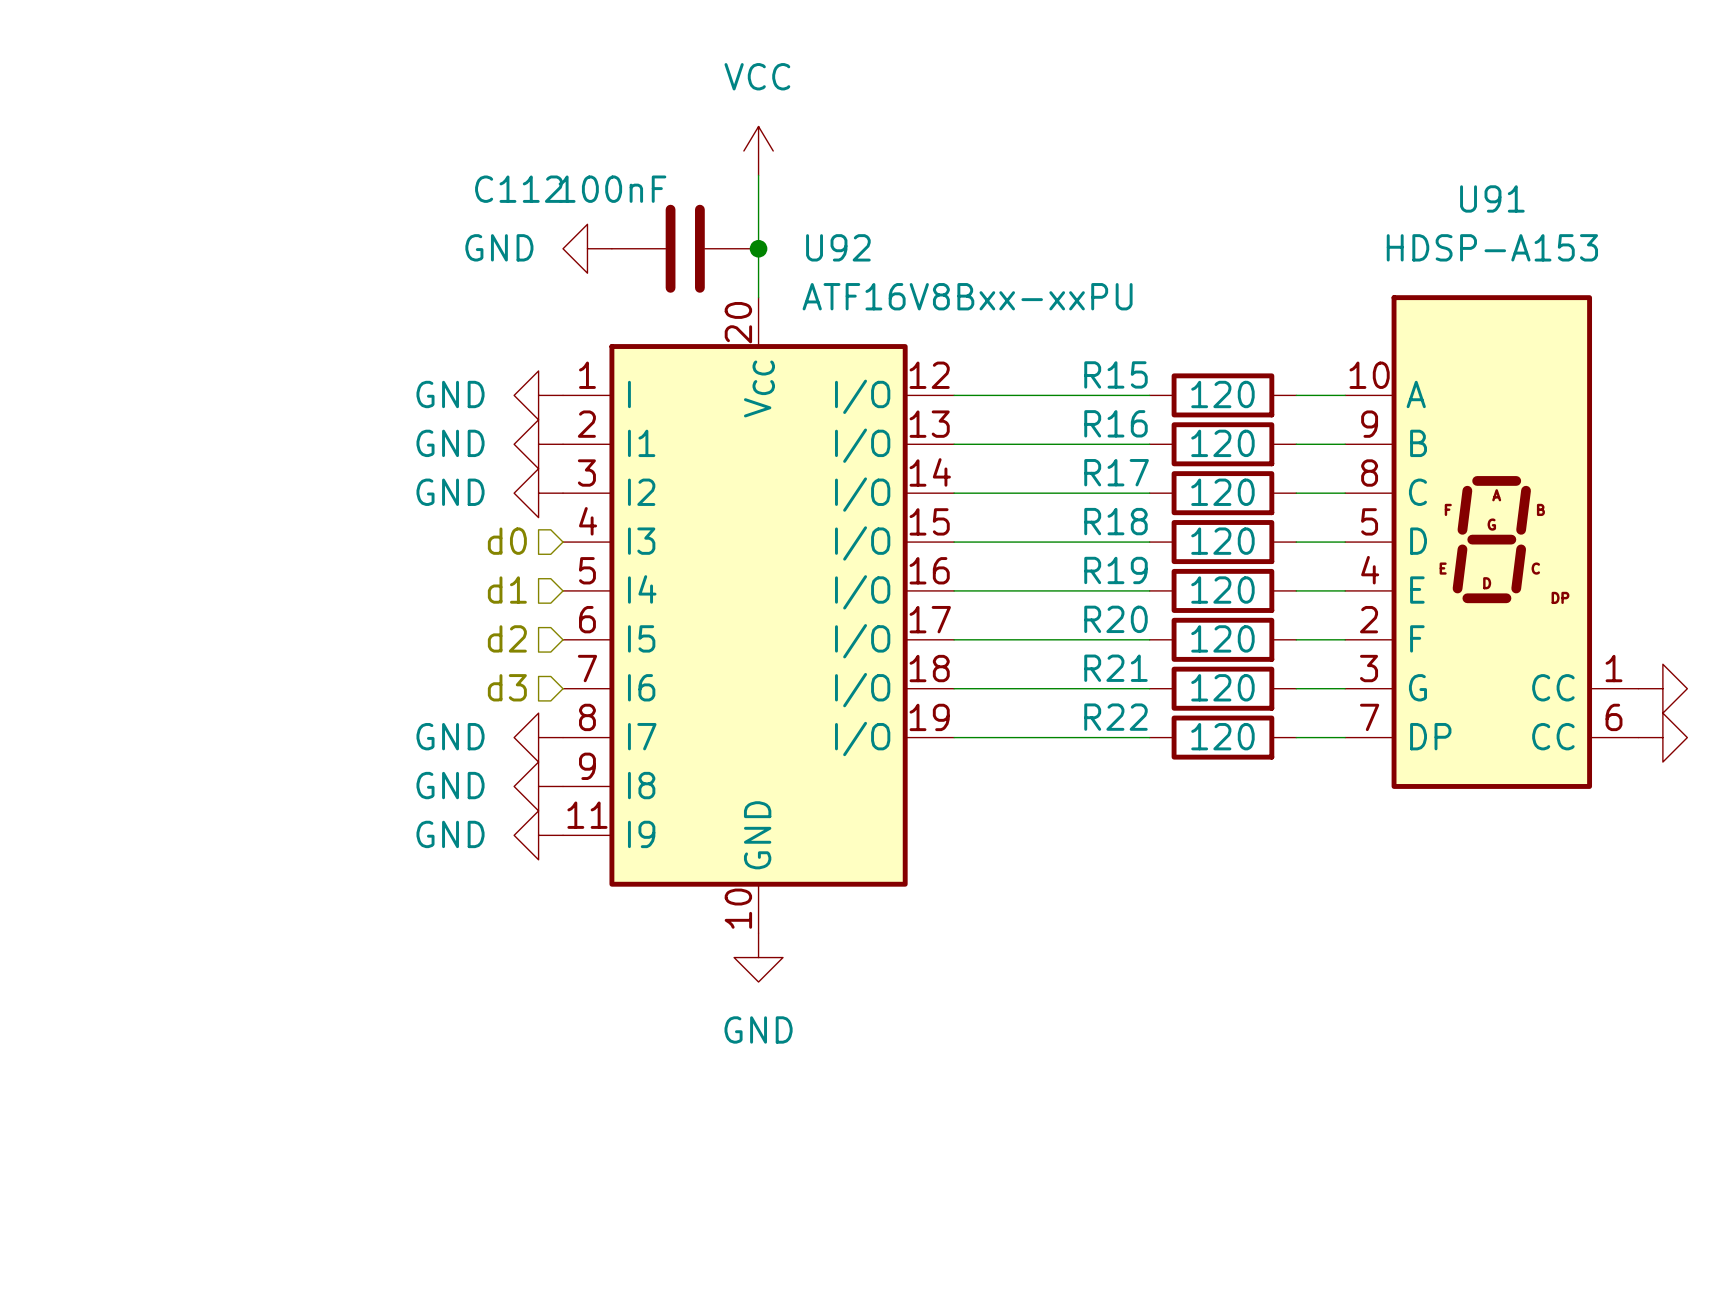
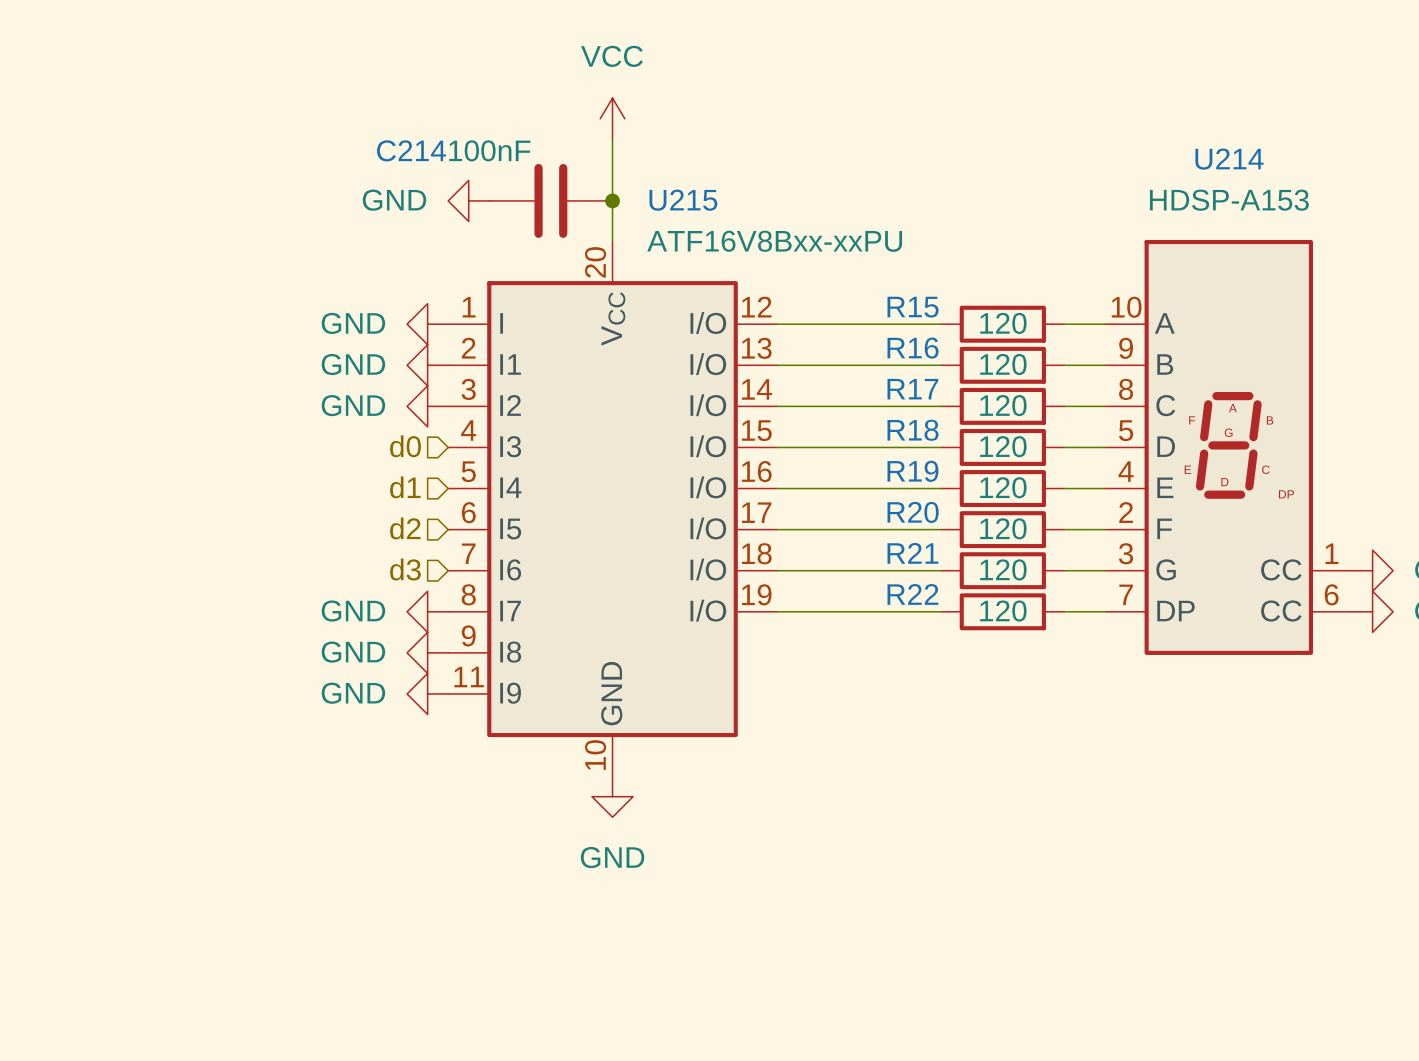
C112 name: C112 (519, 189) -> C214 (411, 150)
U91 name: U91 (1492, 198) -> U214 (1229, 159)
U92 name: U92 (838, 247) -> U215 (683, 200)

